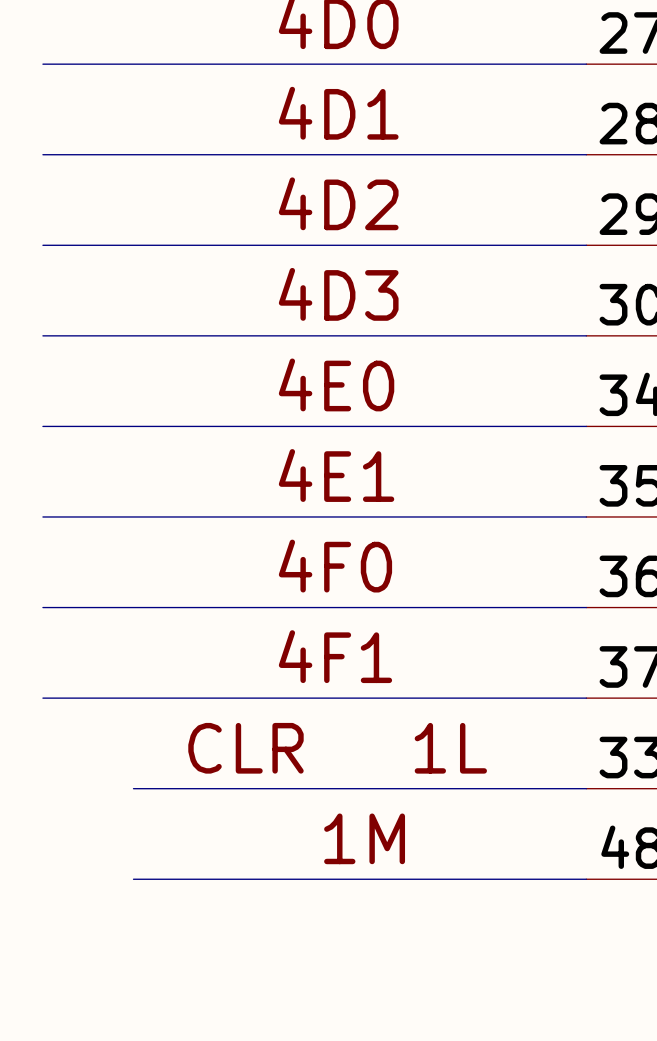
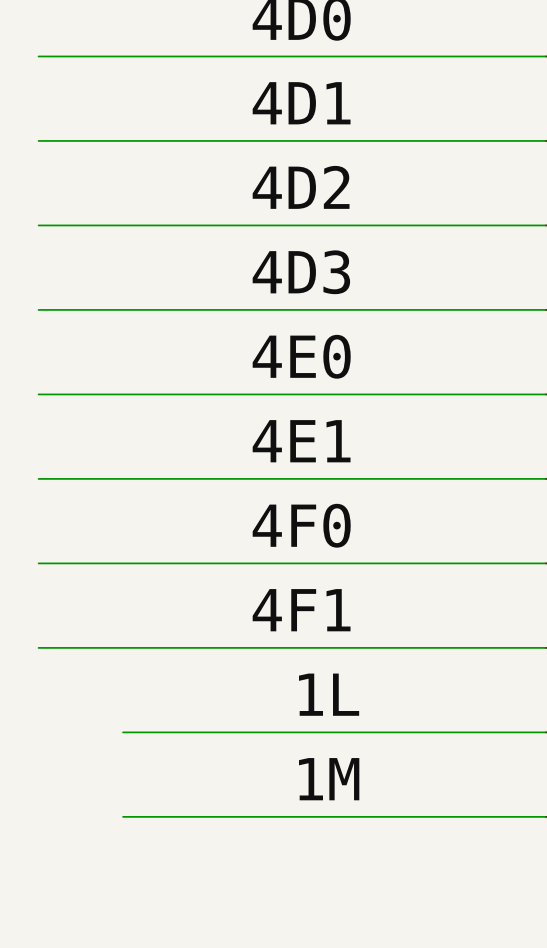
label: CLR (245, 748) -> none
label position: 1L (450, 748) -> 1L (329, 694)

